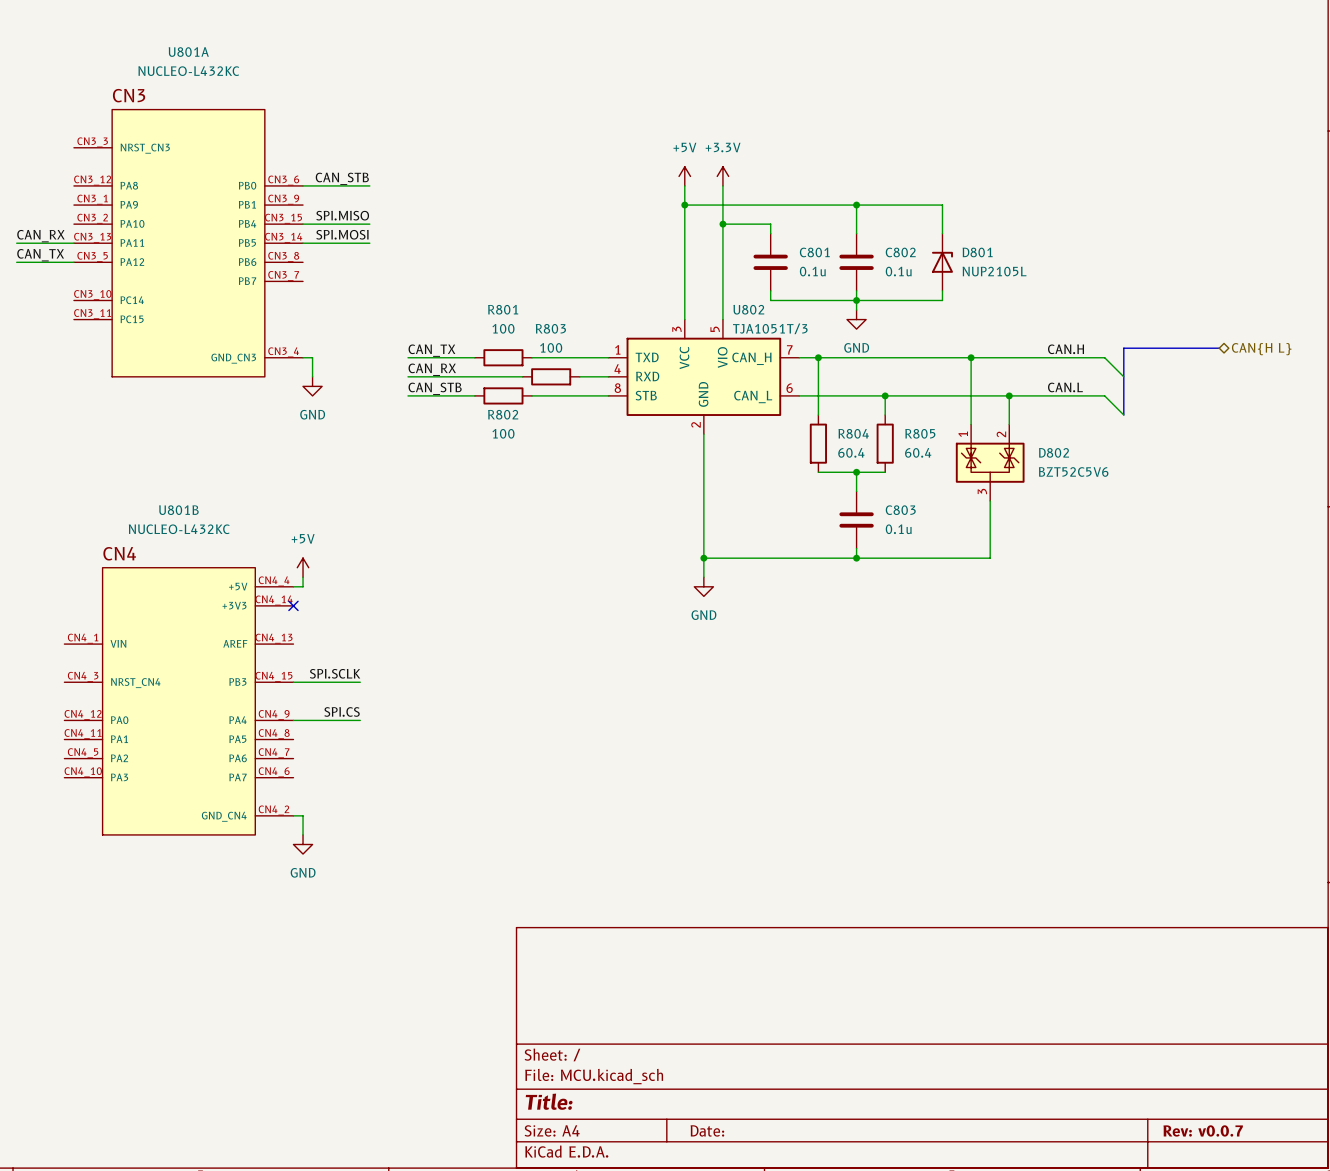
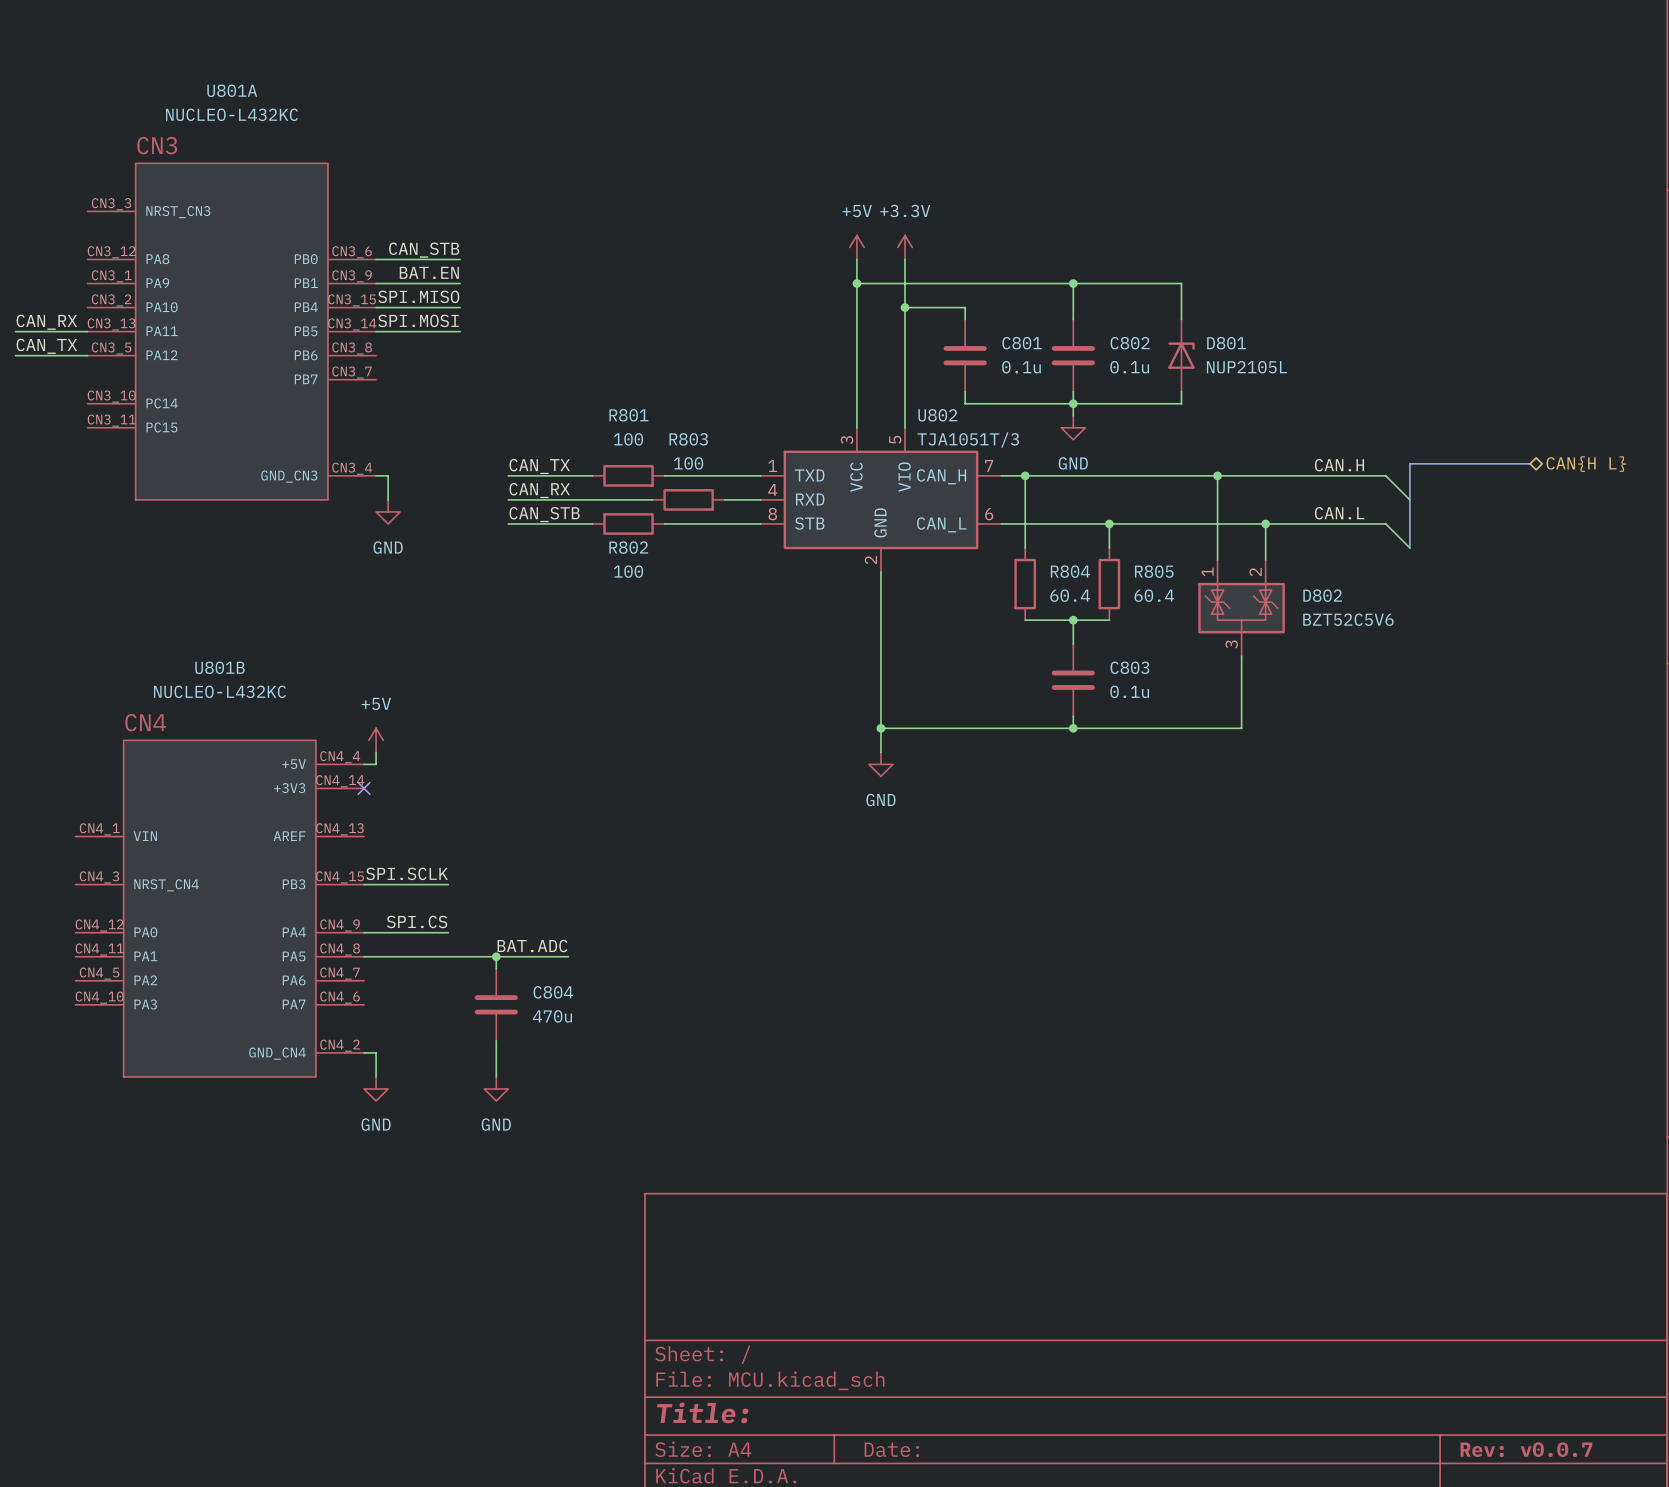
label: none -> BAT.EN (429, 272)
wire: none -> (376, 283) (460, 283)
label: none -> BAT.ADC (532, 946)
wire: none -> (364, 956) (568, 956)
wire: none -> (496, 956) (496, 968)
junction: none -> (496, 956)
C804: none -> 470u (496, 1004)
wire: none -> (496, 1040) (496, 1076)
power symbol: none -> GND (496, 1088)

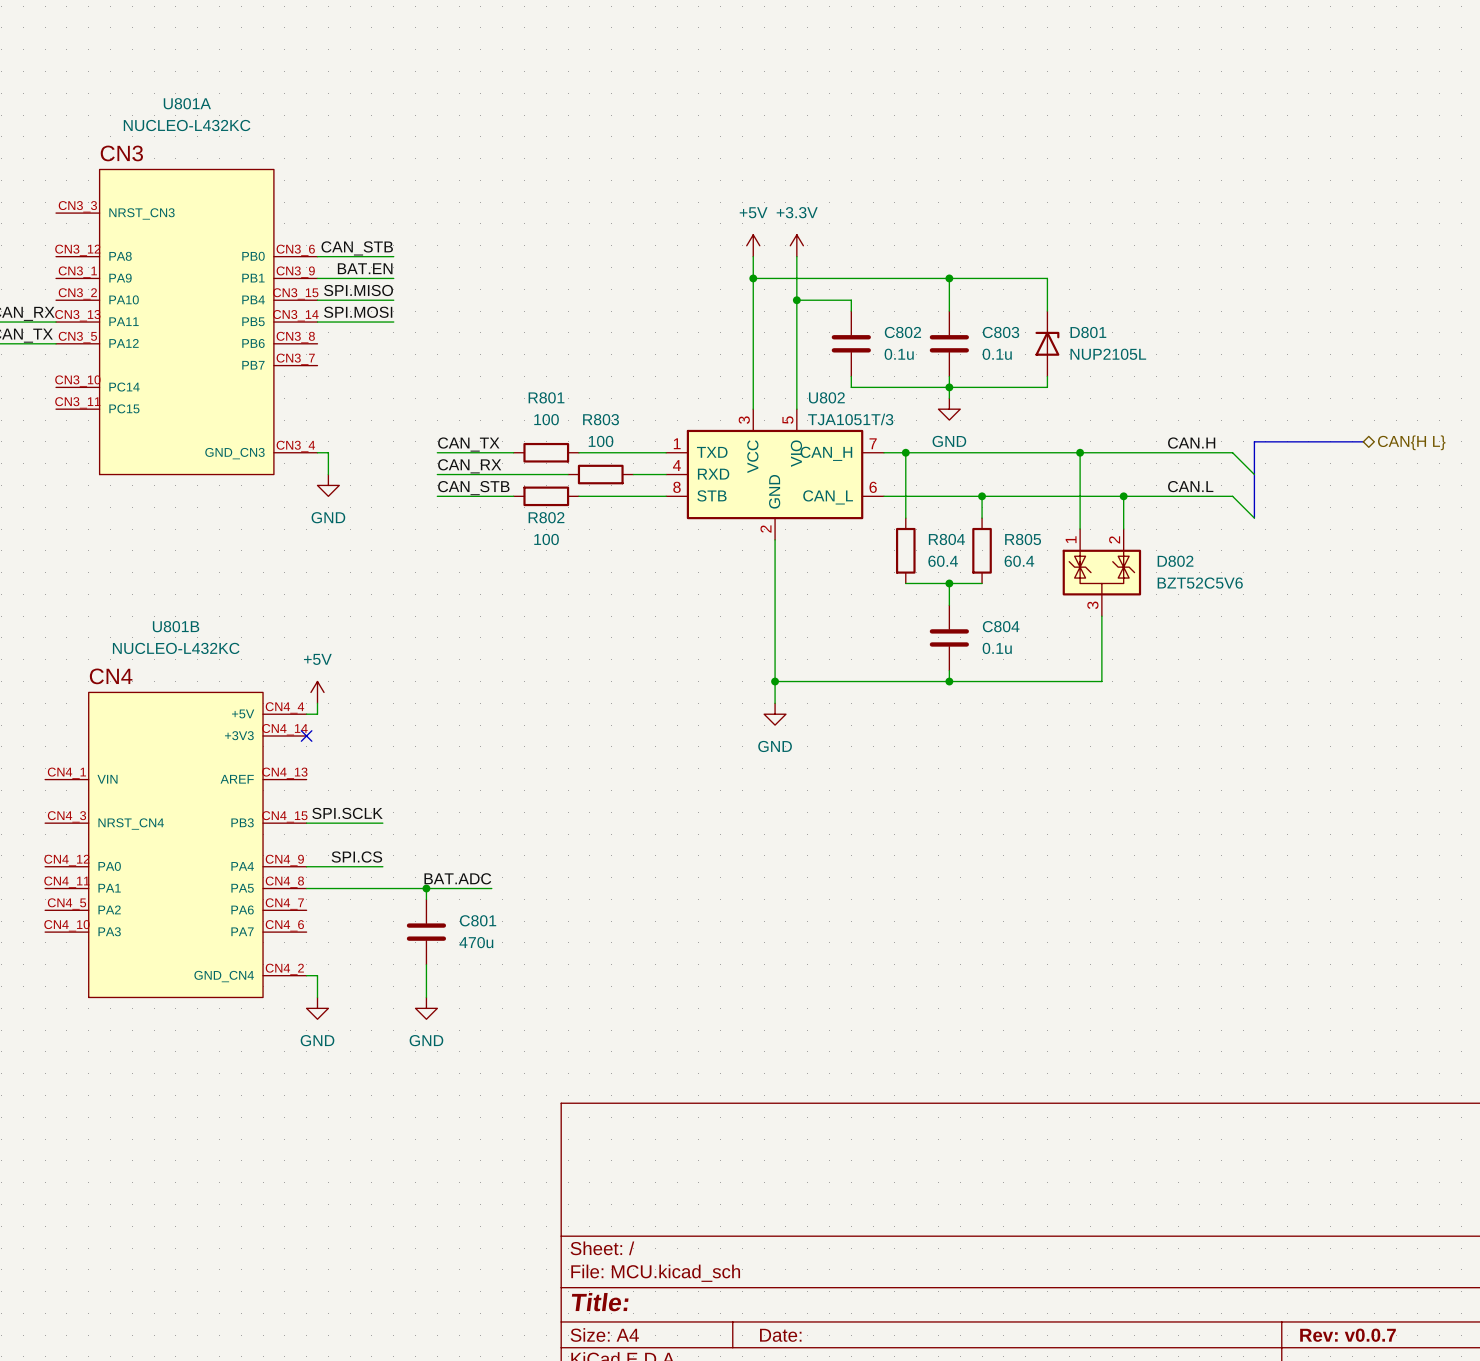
C801 name: C801 (1022, 343) -> C802 (902, 332)
C802 name: C802 (1130, 343) -> C803 (1001, 332)
C803 name: C803 (1129, 667) -> C804 (1001, 626)
C804 name: C804 (553, 992) -> C801 (478, 920)

